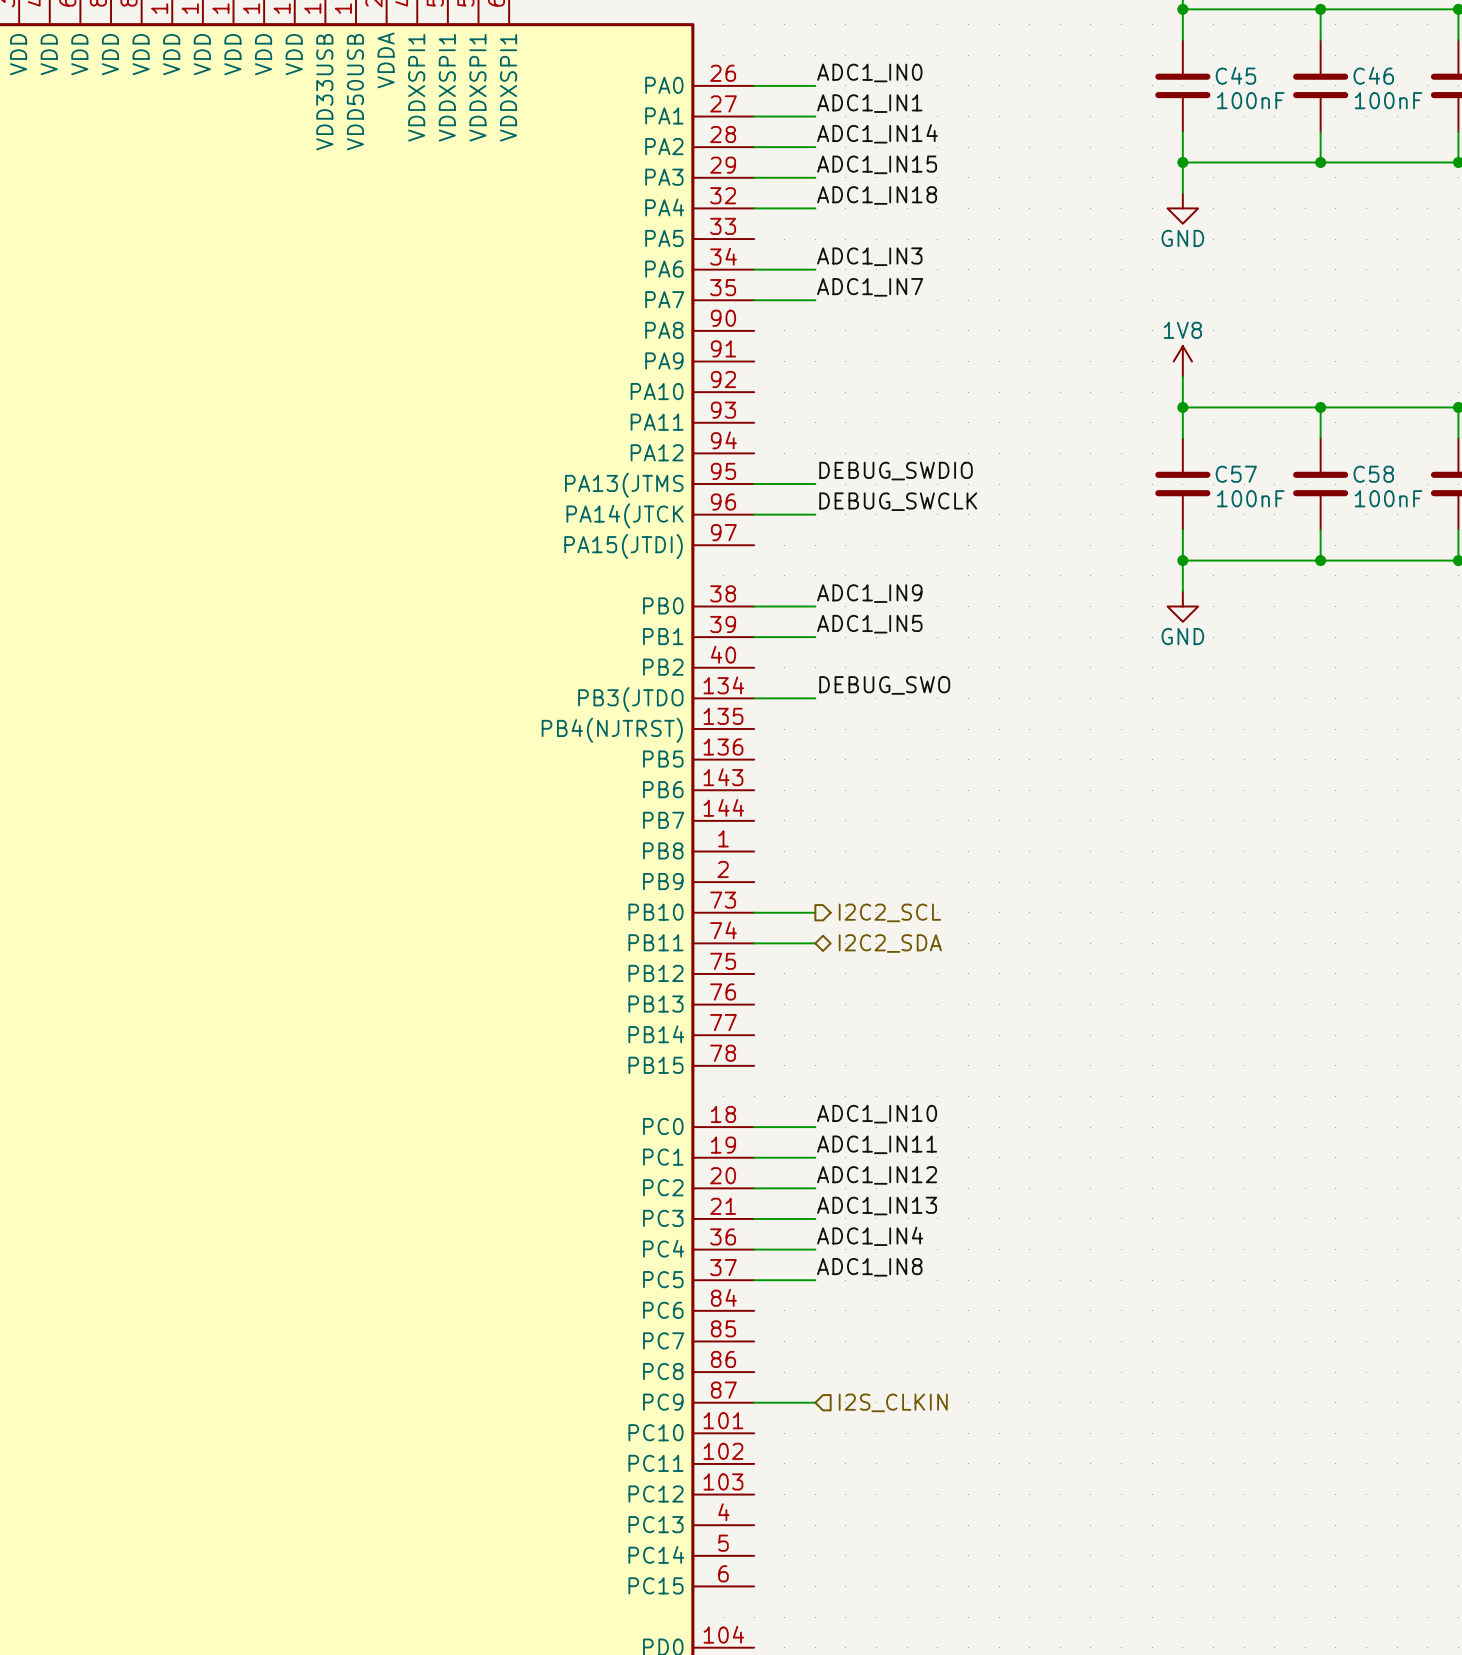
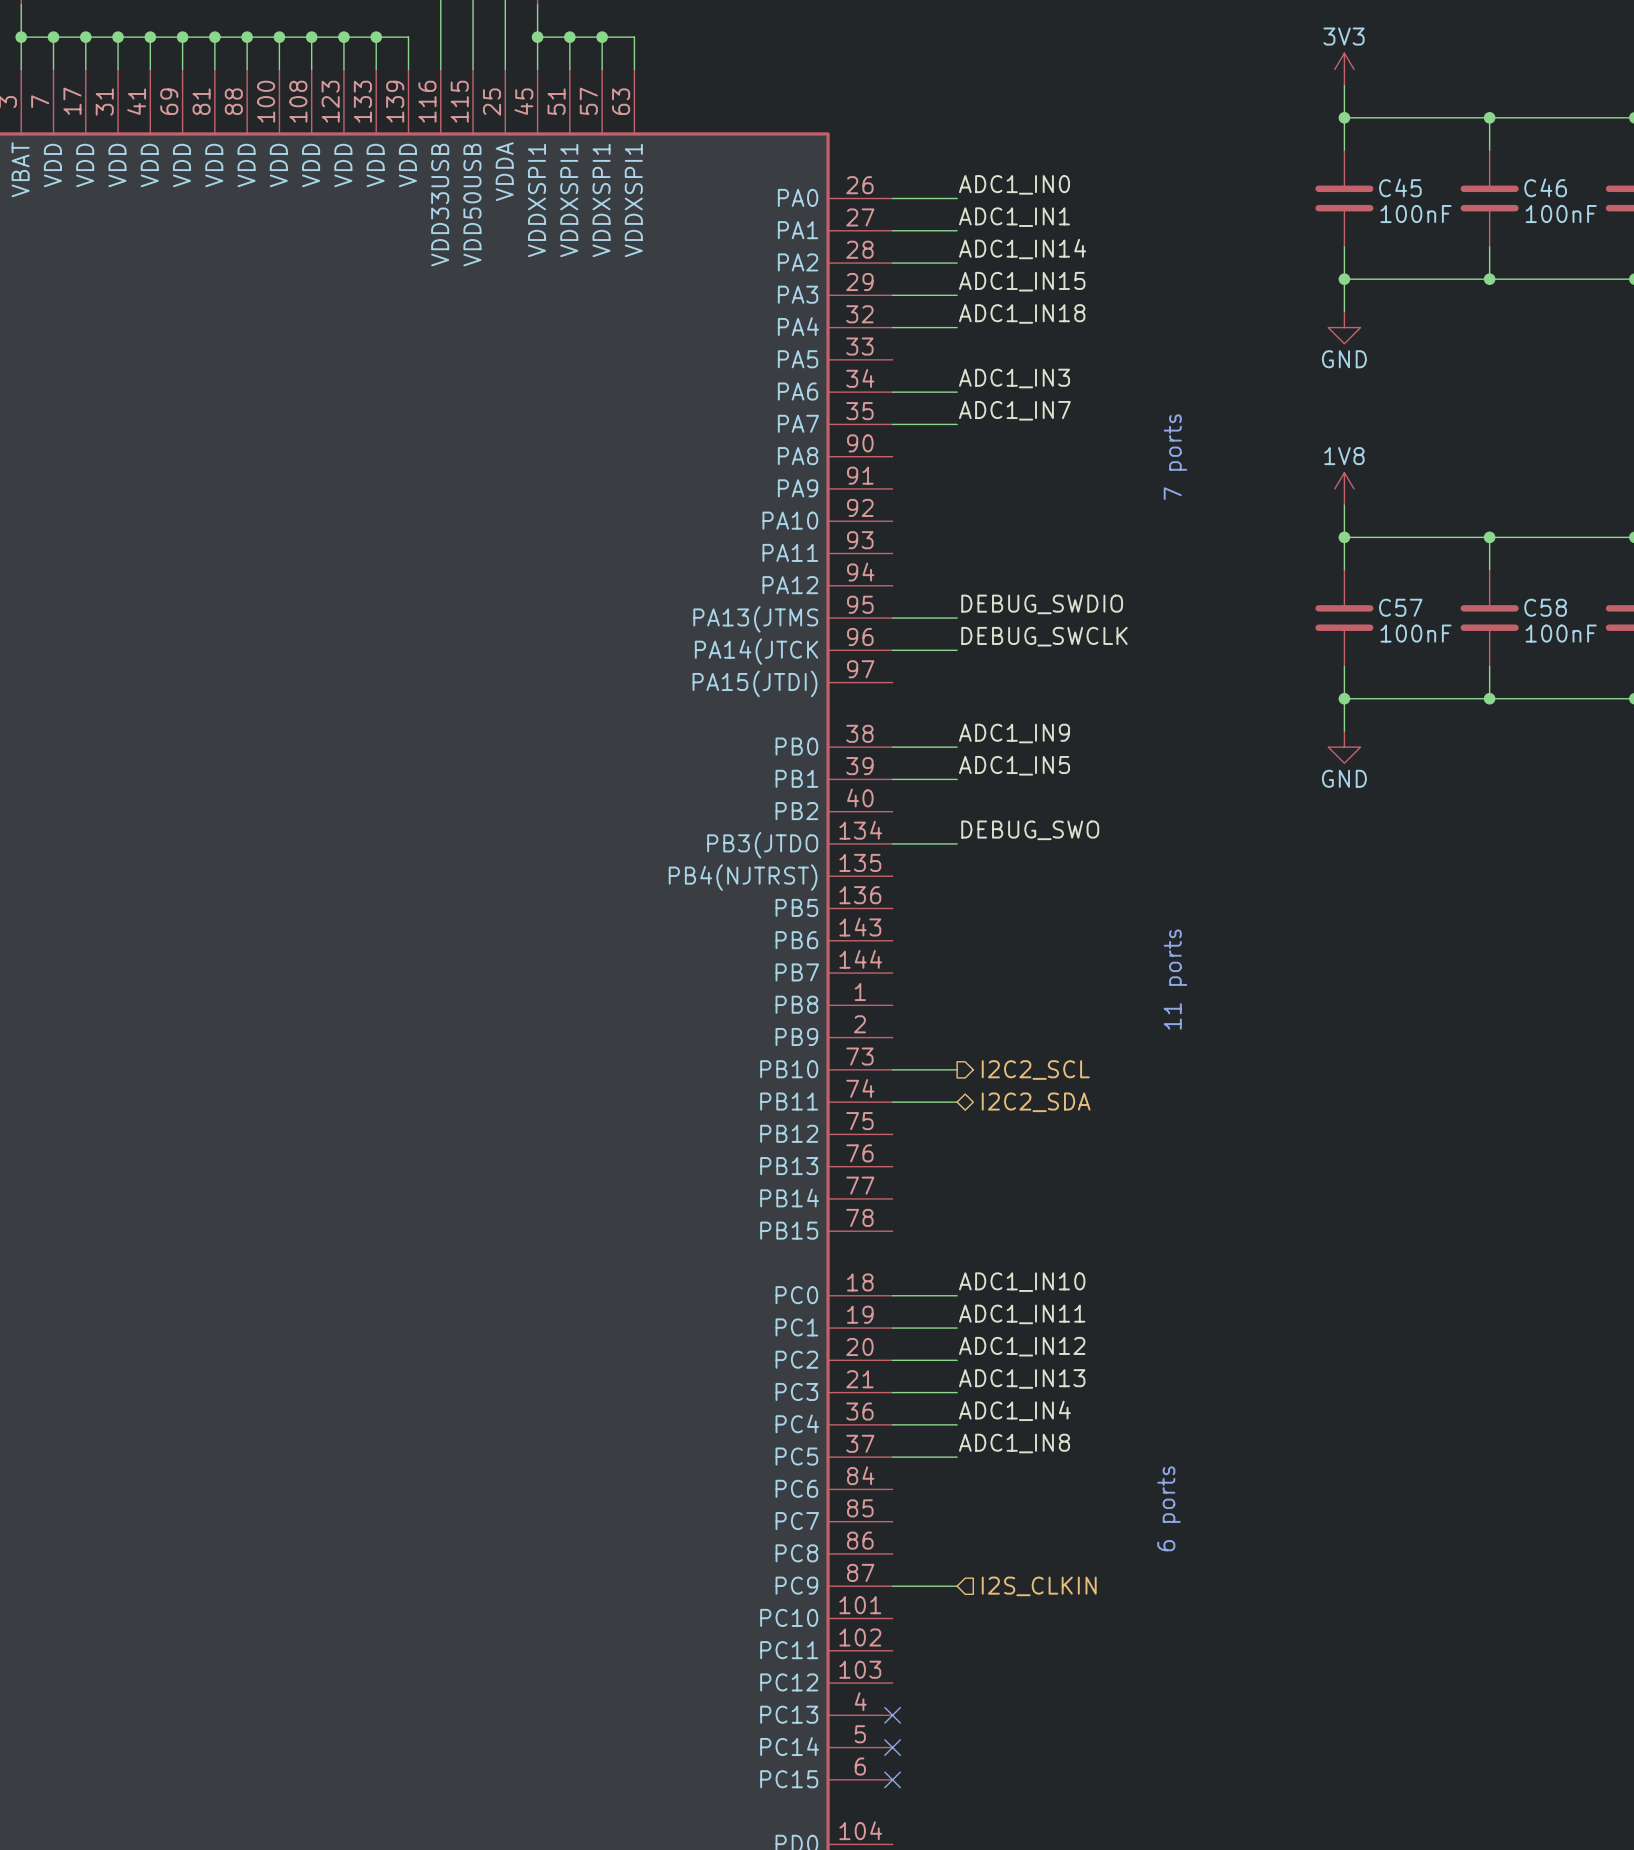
text: none -> 7 ports (1175, 457)
text: none -> 11 ports (1175, 979)
text: none -> 6 ports (1168, 1508)
no-connect mark: none -> (892, 1715)
no-connect mark: none -> (892, 1747)
no-connect mark: none -> (892, 1779)

